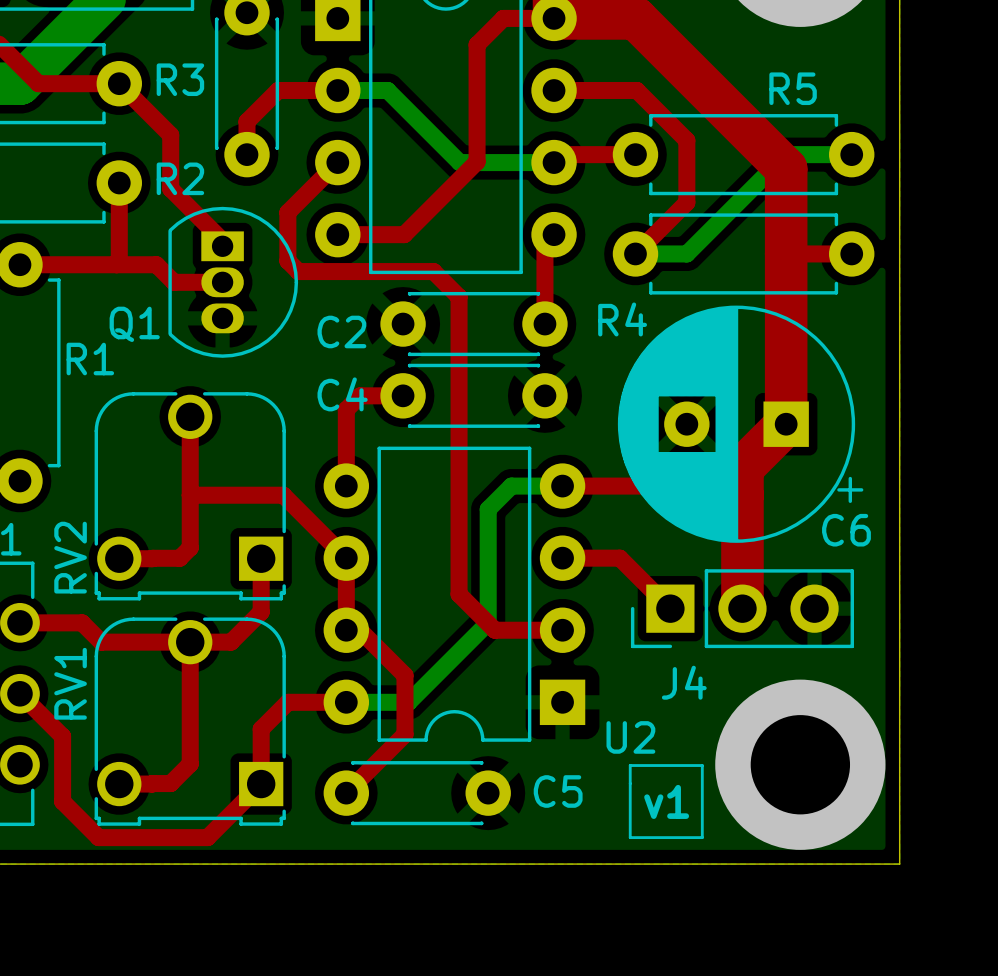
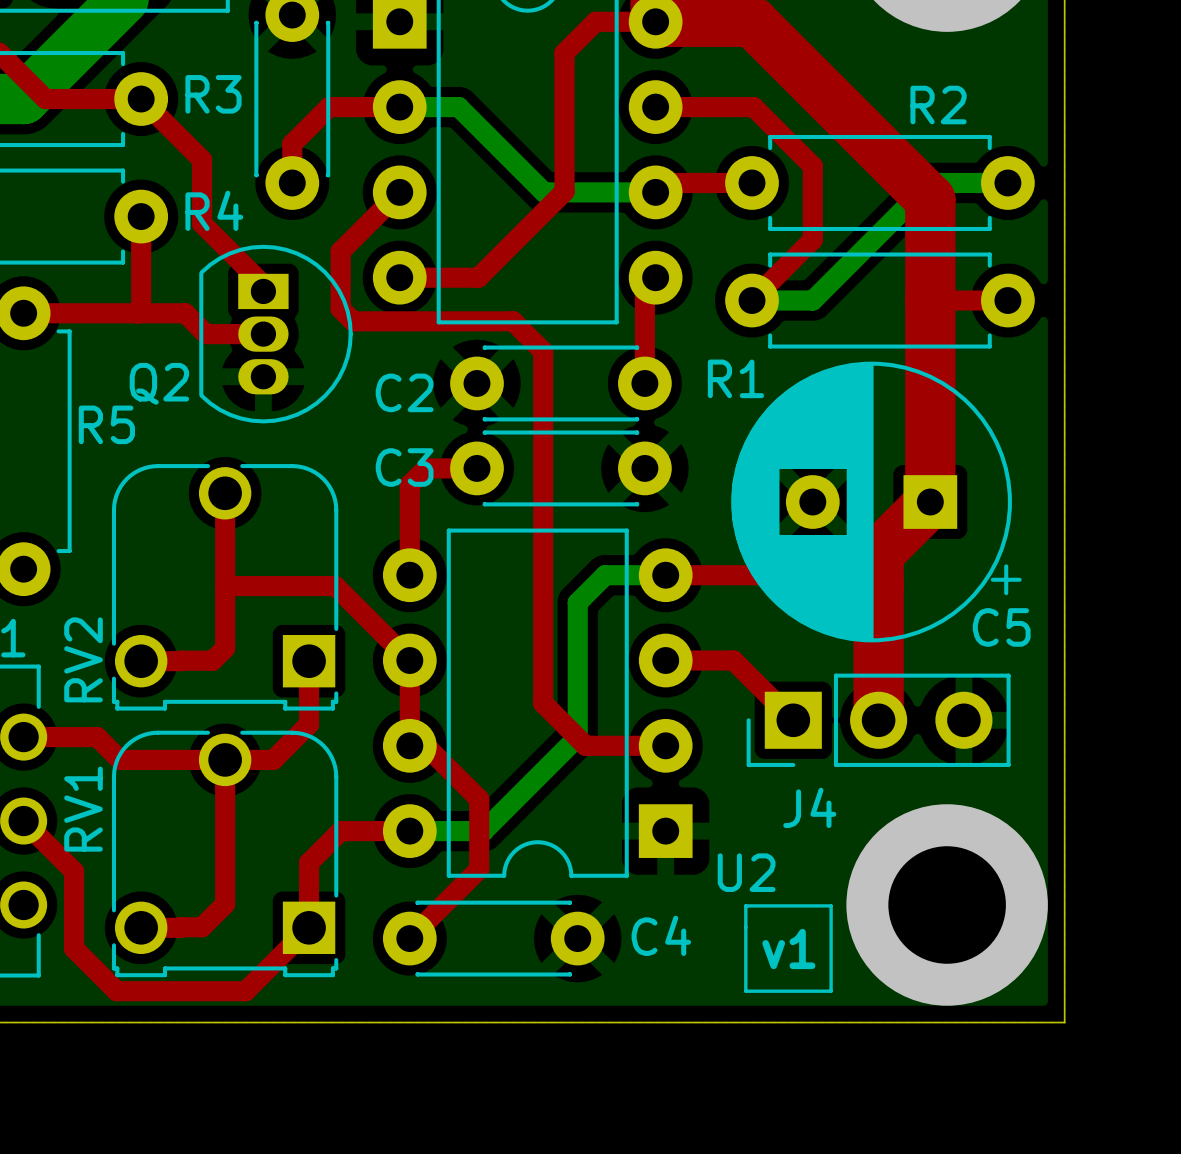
R5 name: R5 (793, 88) -> R2 (938, 104)
R2 name: R2 (180, 178) -> R4 (214, 210)
R4 name: R4 (622, 319) -> R1 (735, 378)
Q1 name: Q1 (134, 324) -> Q2 (159, 383)
R1 name: R1 (90, 359) -> R5 (106, 424)
C4 name: C4 (342, 394) -> C3 (404, 467)
C6 name: C6 (846, 530) -> C5 (1001, 627)
C5 name: C5 (558, 791) -> C4 (661, 935)

